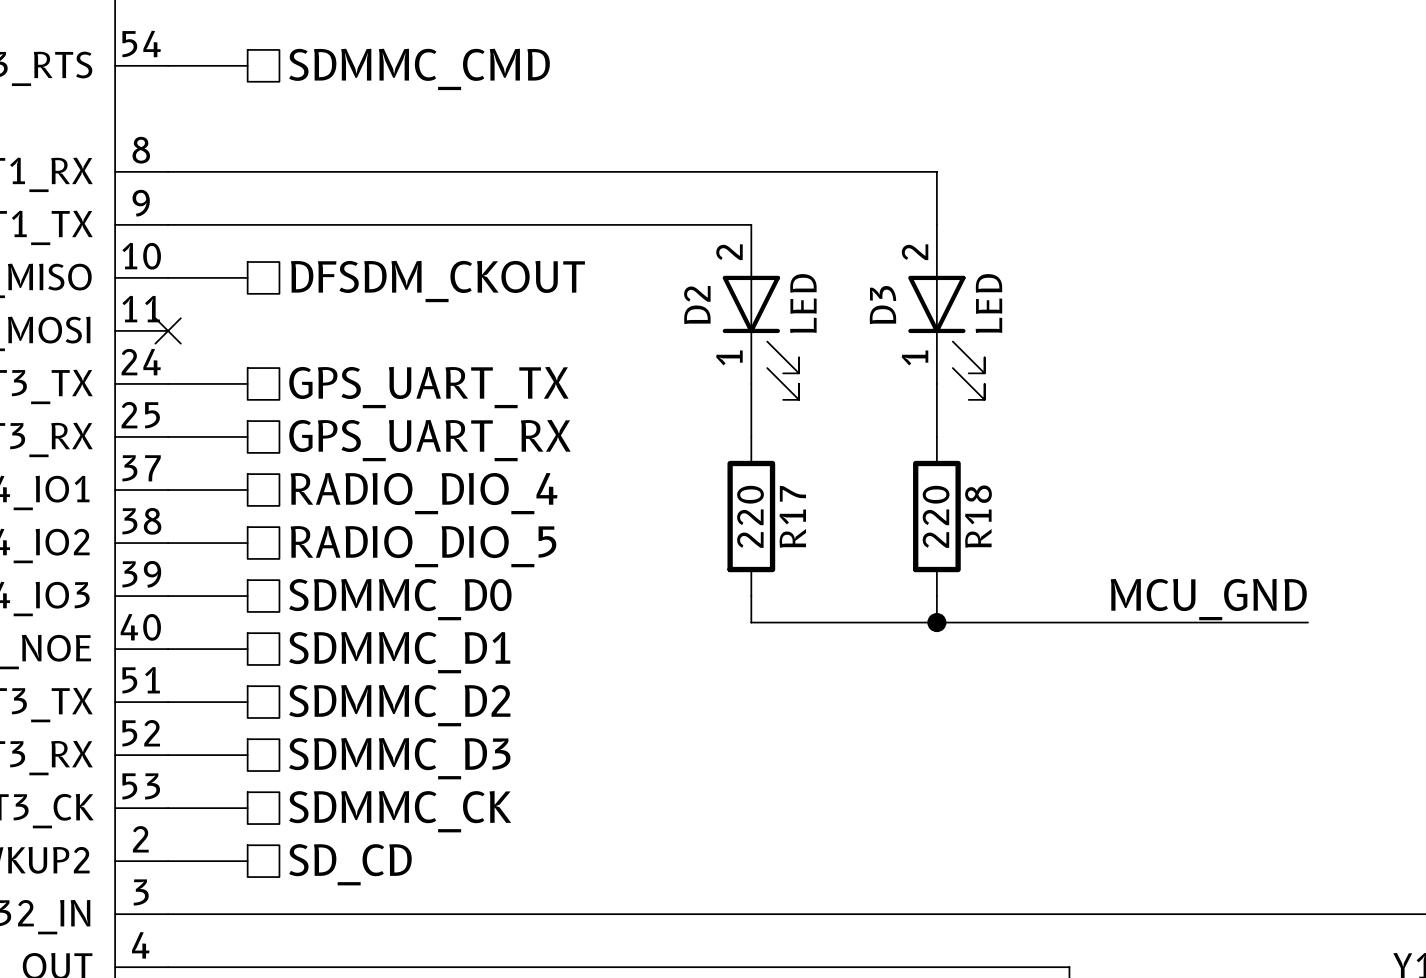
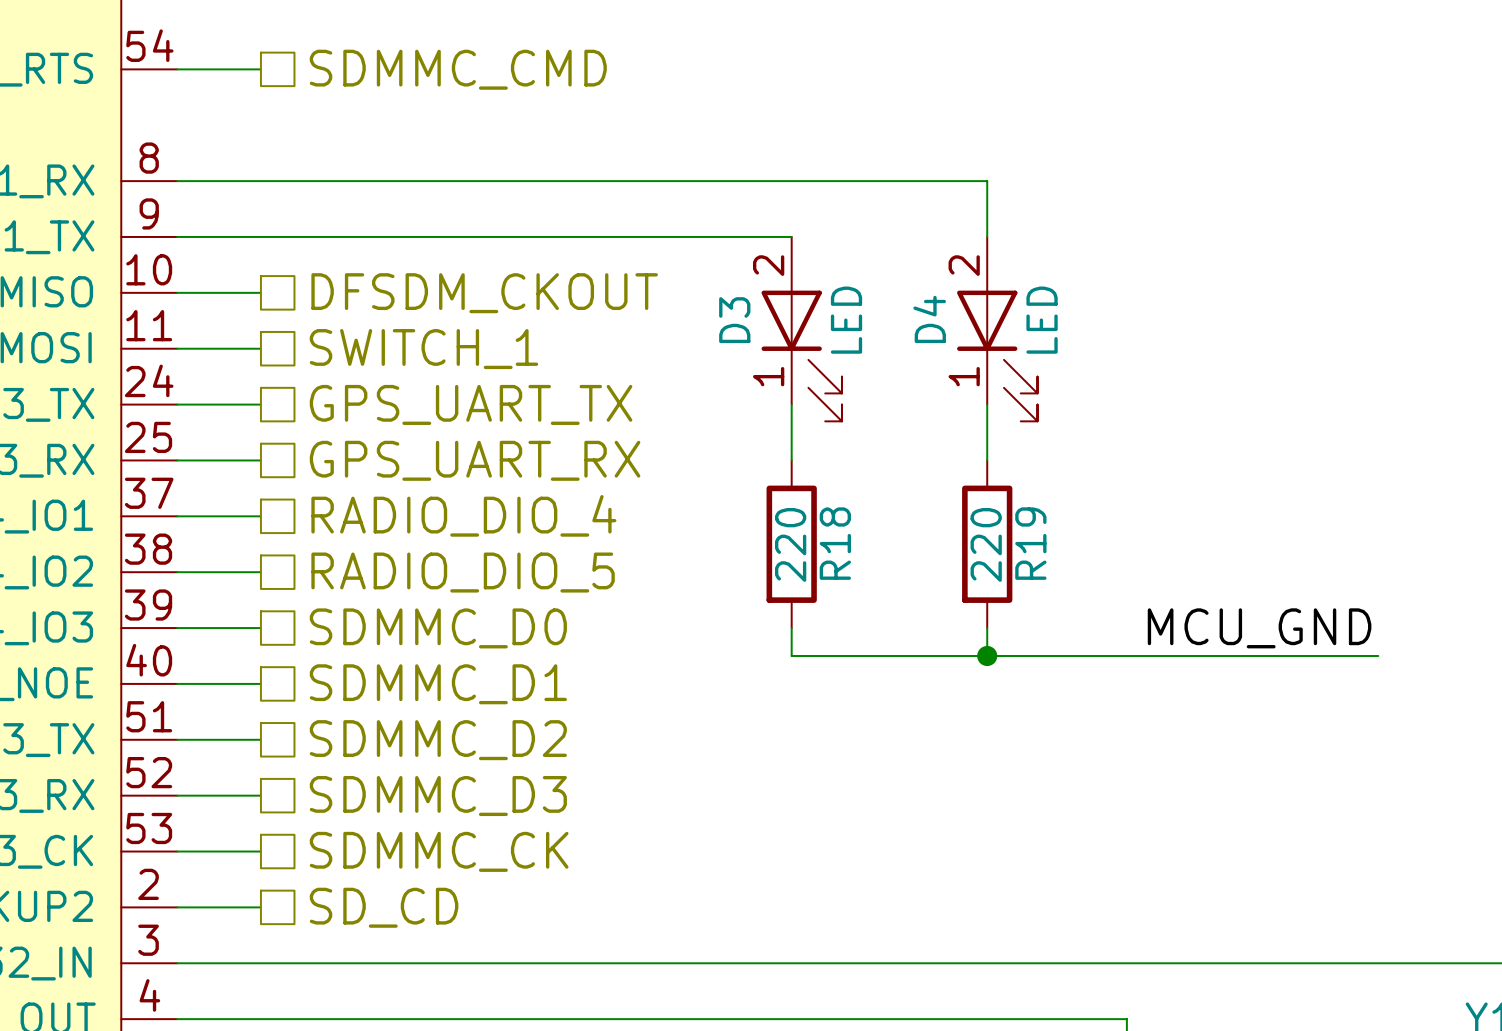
D2 name: D2 (697, 305) -> D3 (734, 320)
D3 name: D3 (882, 305) -> D4 (929, 319)
wire: none -> (177, 348) (260, 348)
no-connect mark: (168, 330) -> none
hierarchical label: none -> SWITCH_1 (423, 349)
R17 name: R17 (792, 516) -> R18 (835, 543)
R18 name: R18 (978, 516) -> R19 (1030, 543)

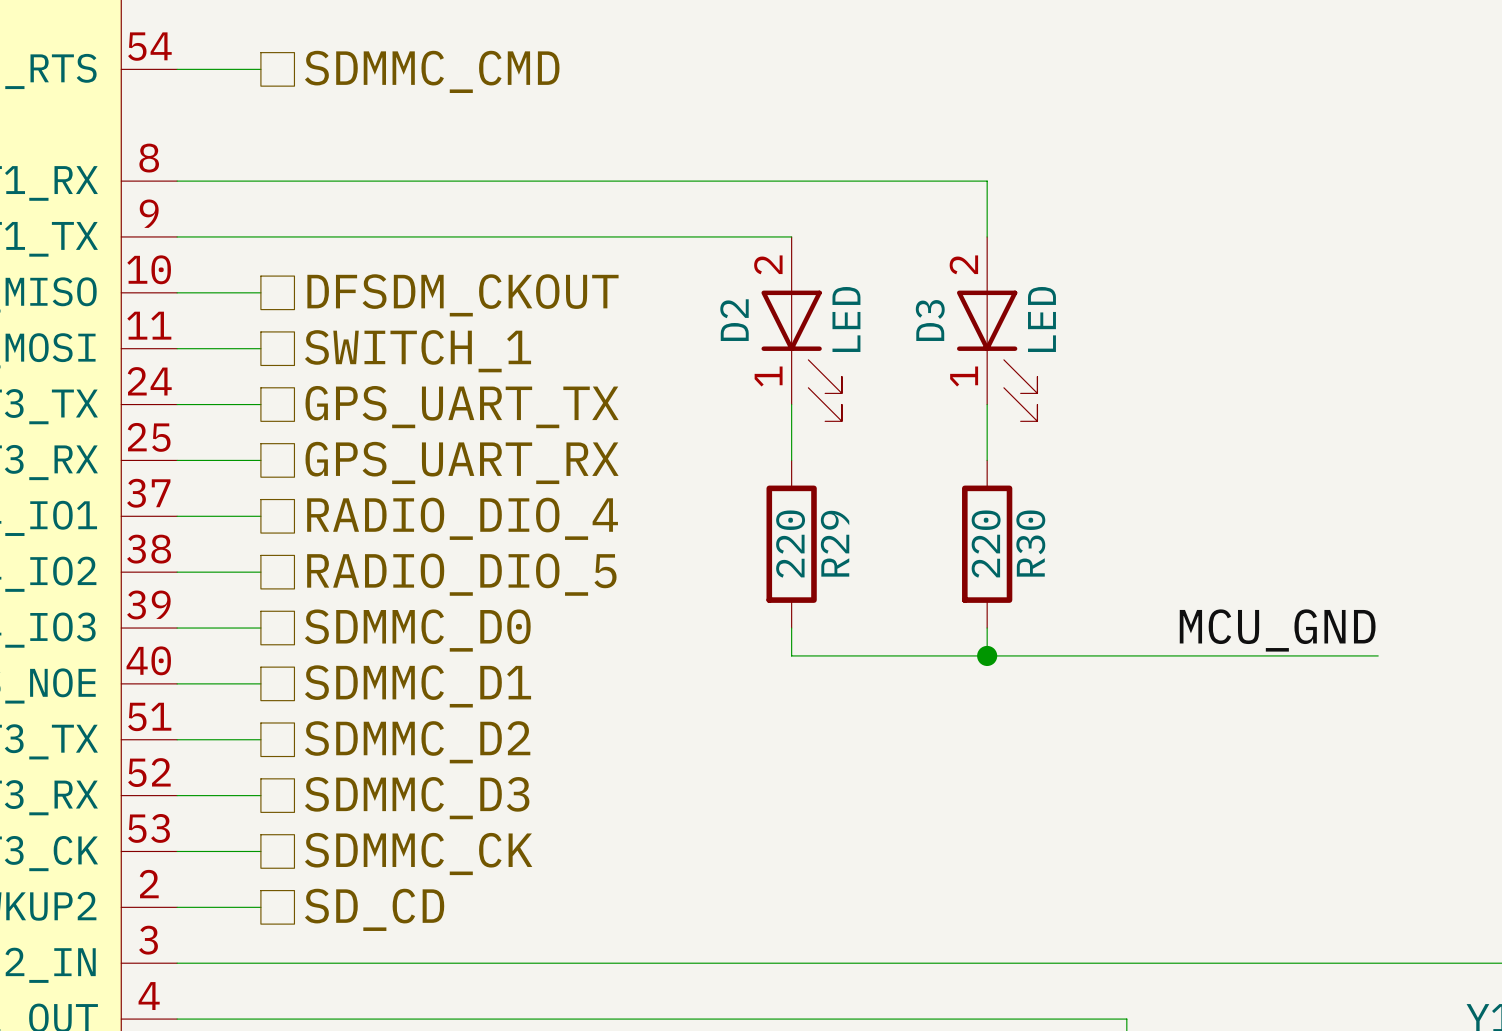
D4 name: D4 (929, 319) -> D3 (930, 320)
D3 name: D3 (734, 320) -> D2 (734, 320)
R18 name: R18 (835, 543) -> R29 (835, 543)
R19 name: R19 (1030, 543) -> R30 (1030, 543)

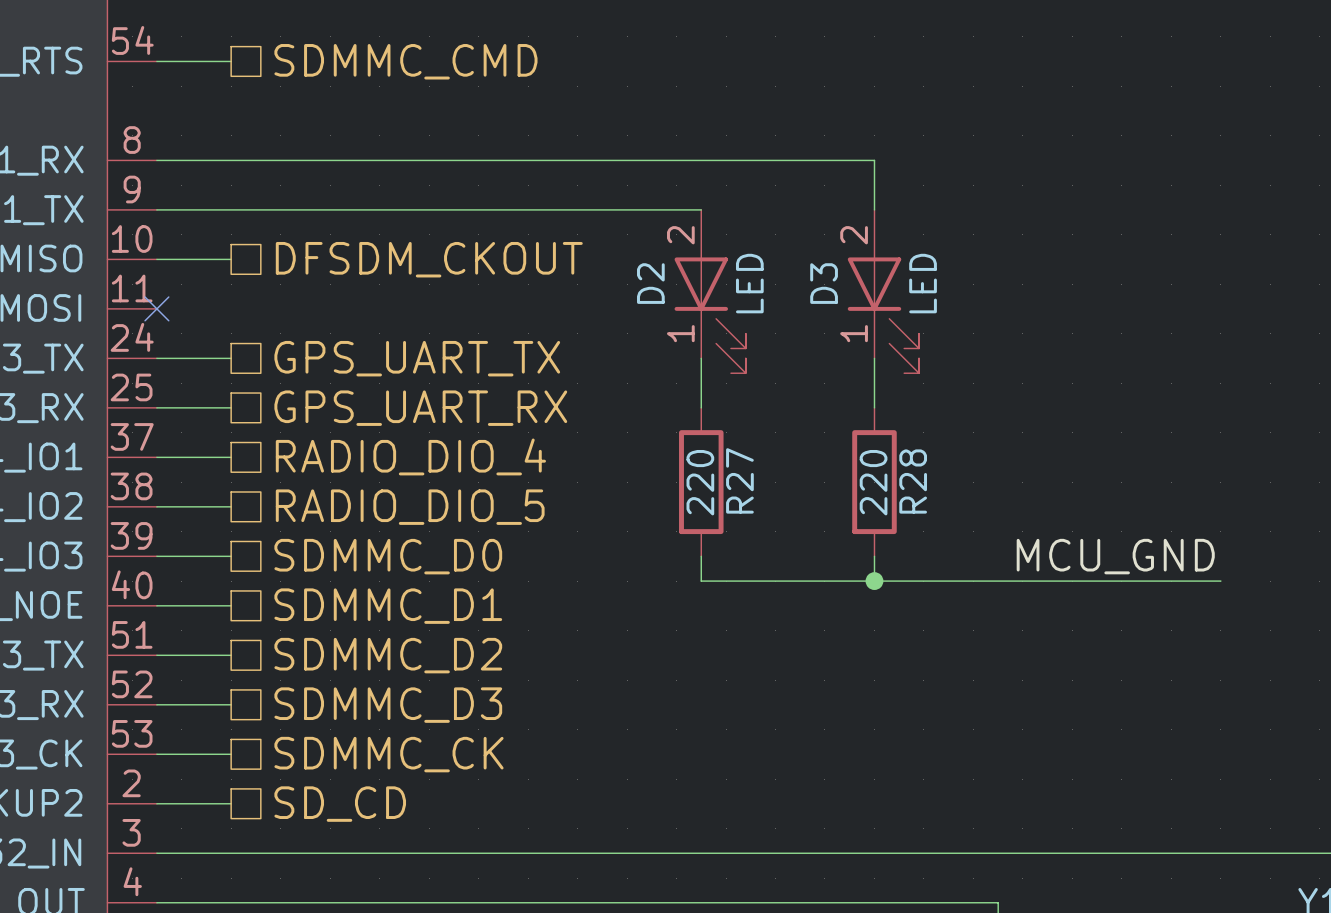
wire: (177, 348) (260, 348) -> none
no-connect mark: none -> (156, 308)
hierarchical label: SWITCH_1 (418, 351) -> none
R29 name: R29 (835, 543) -> R27 (739, 480)
R30 name: R30 (1030, 543) -> R28 (913, 481)

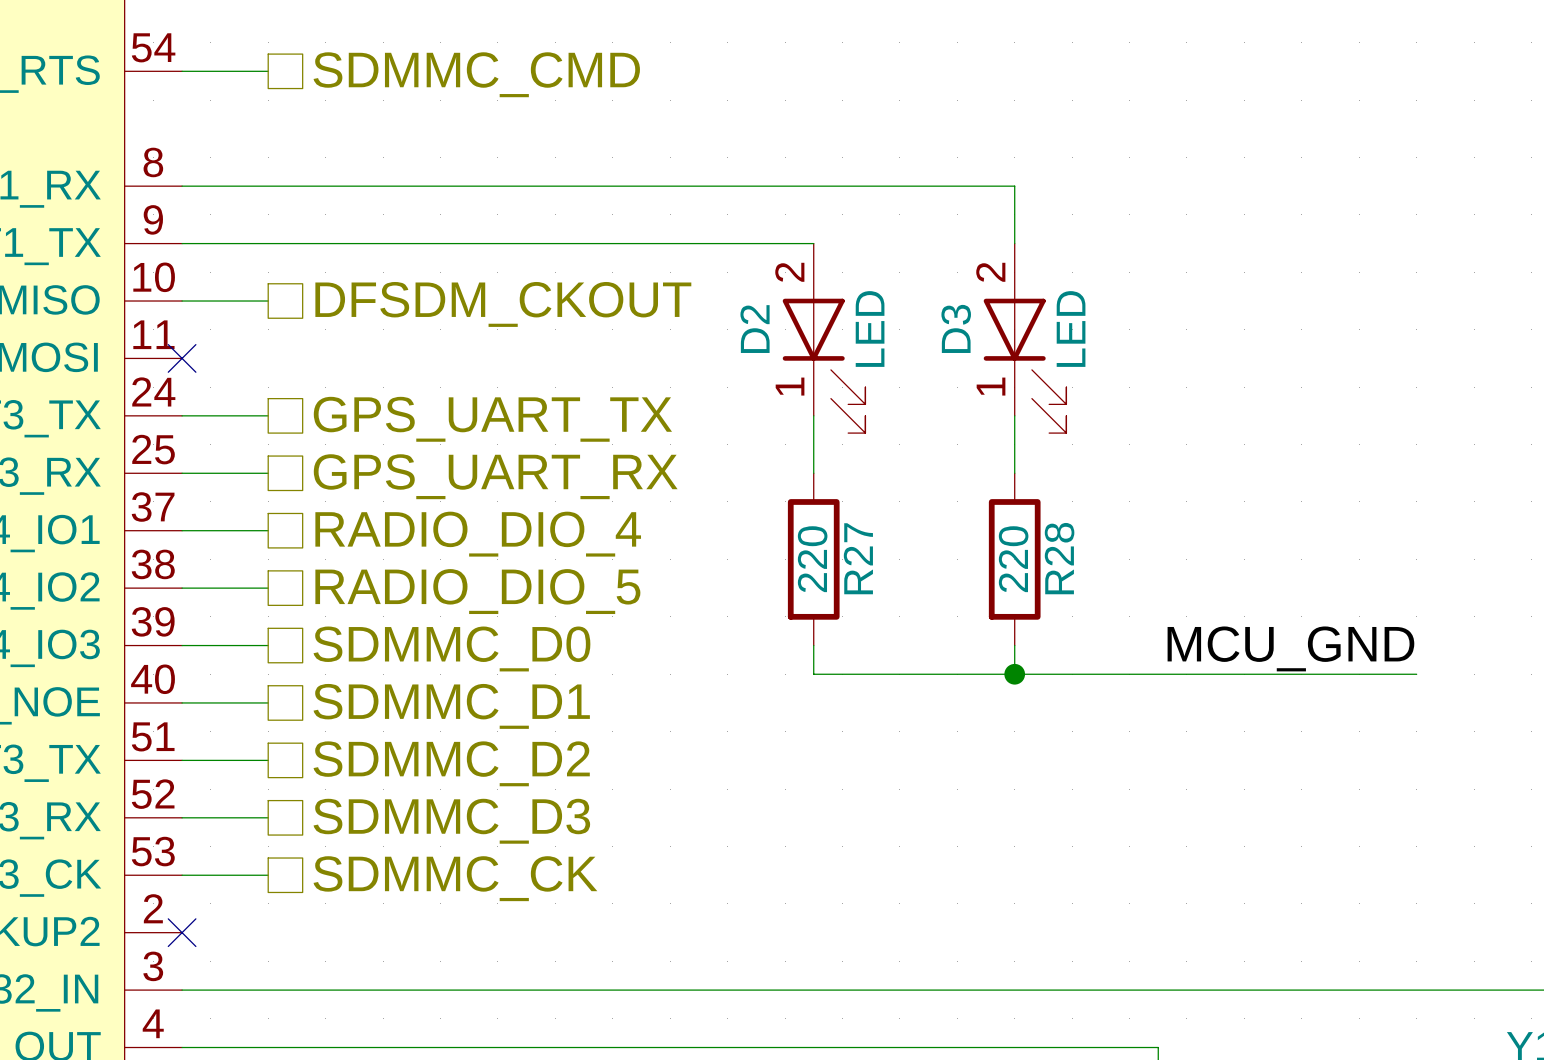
wire: (156, 803) (231, 803) -> none
no-connect mark: none -> (182, 932)
hierarchical label: SD_CD (340, 804) -> none

